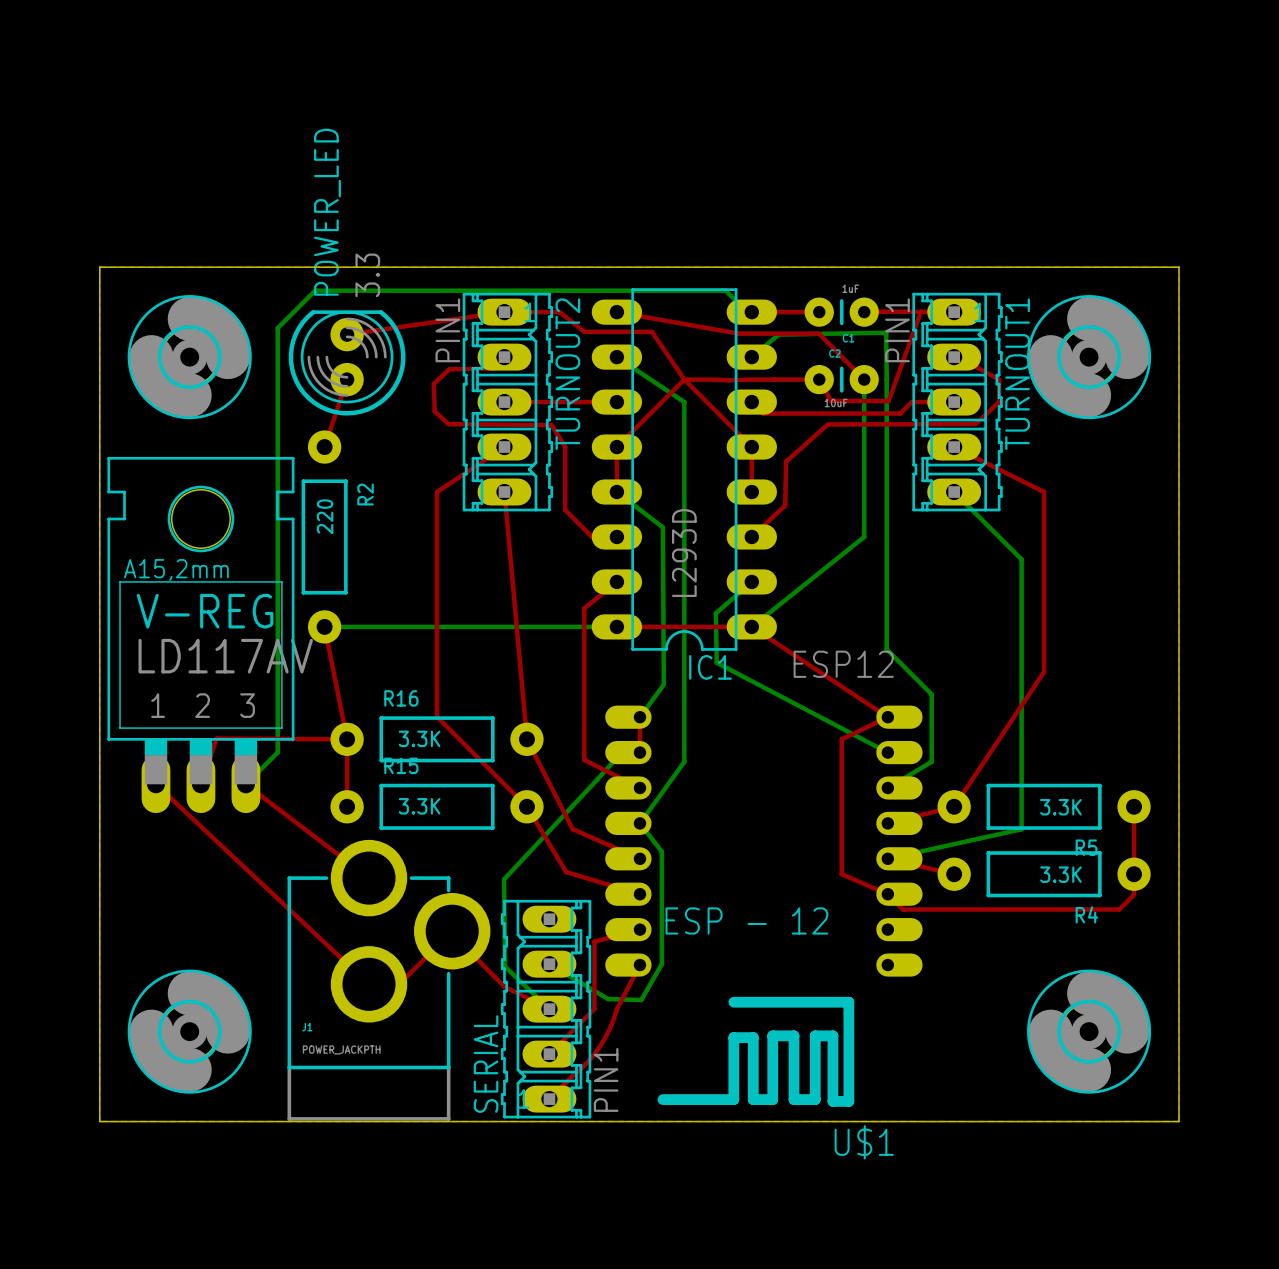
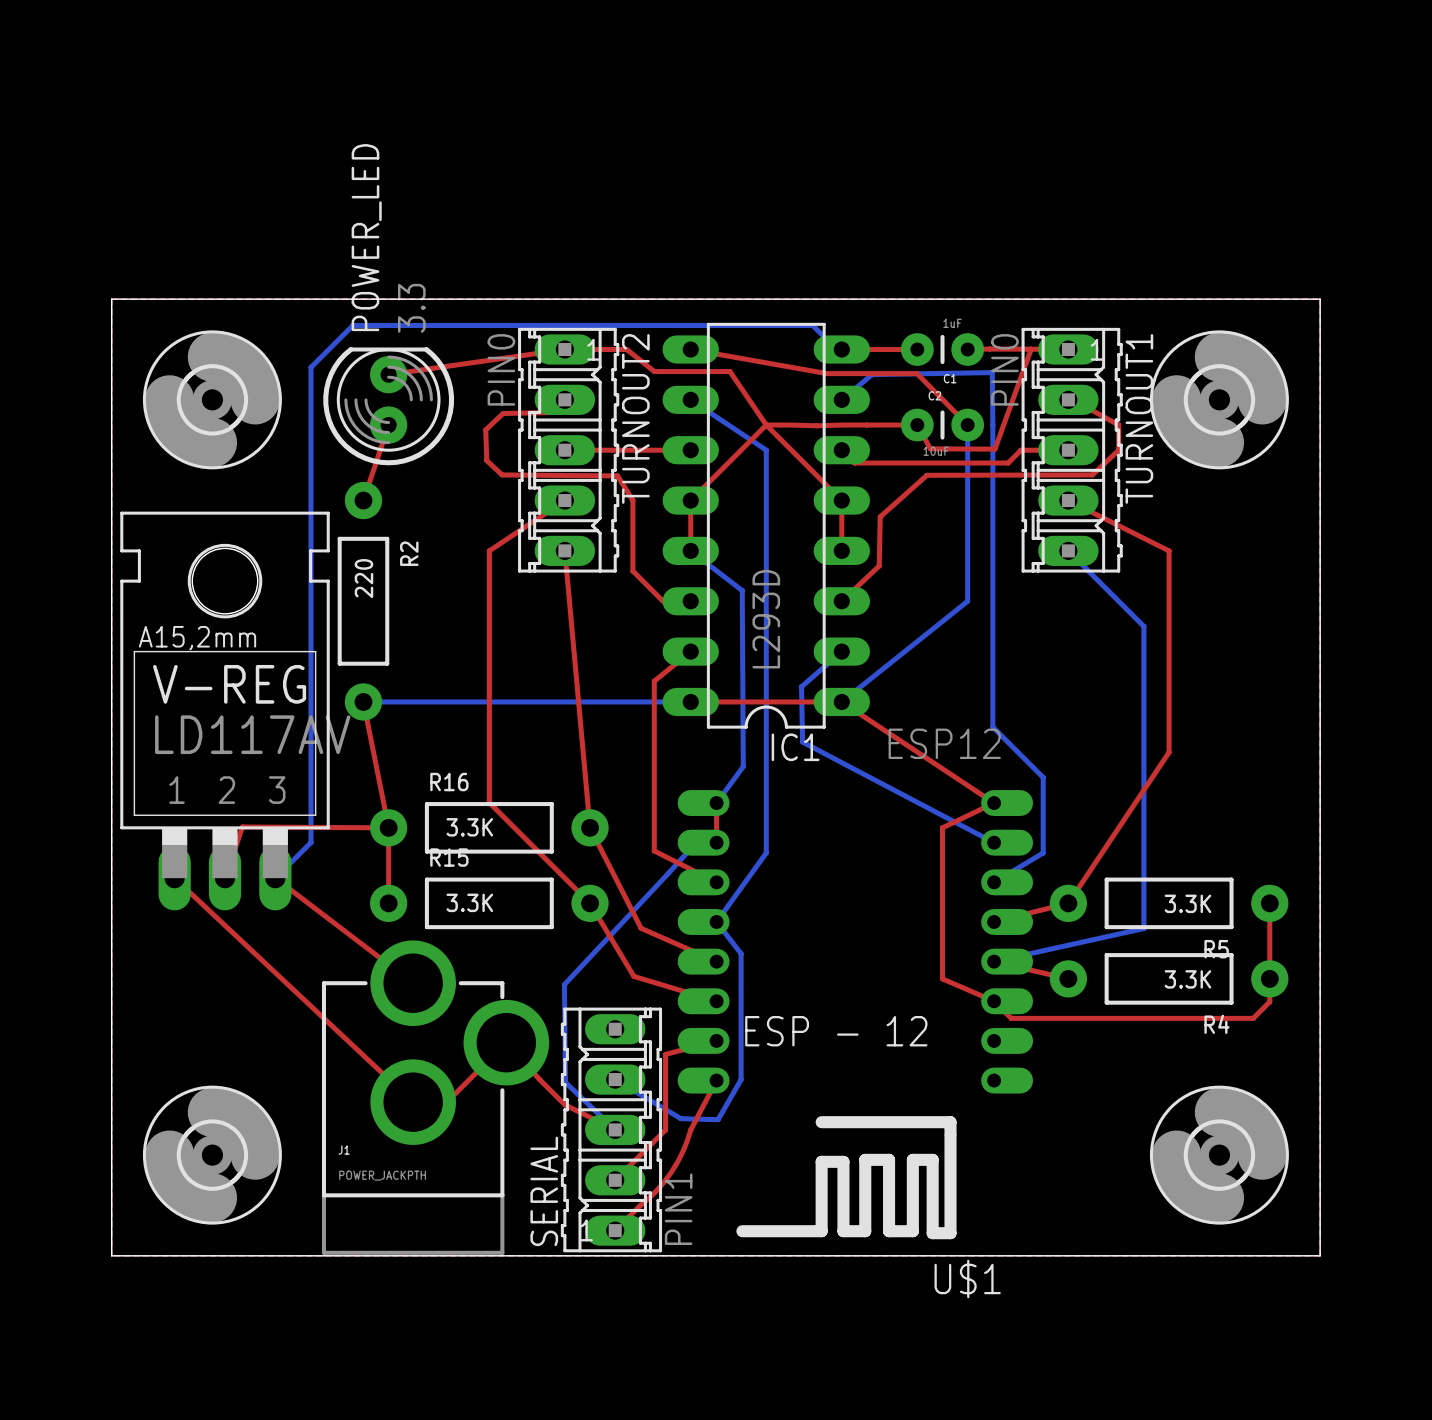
TURNOUT2 value: PIN1 (447, 330) -> PIN0 (501, 369)
TURNOUT1 value: PIN1 (897, 330) -> PIN0 (1004, 369)

